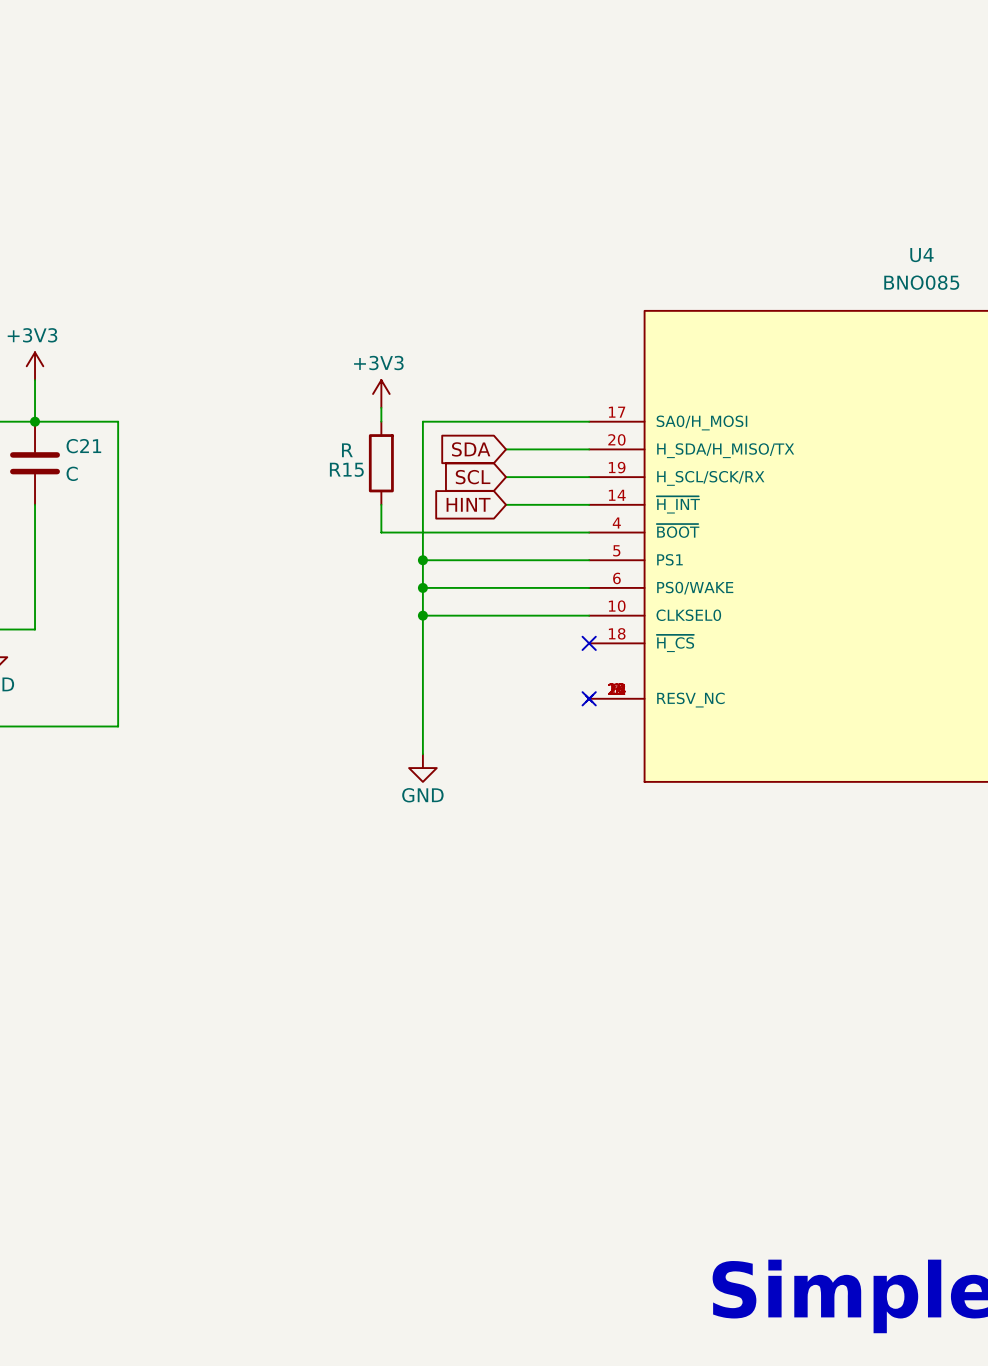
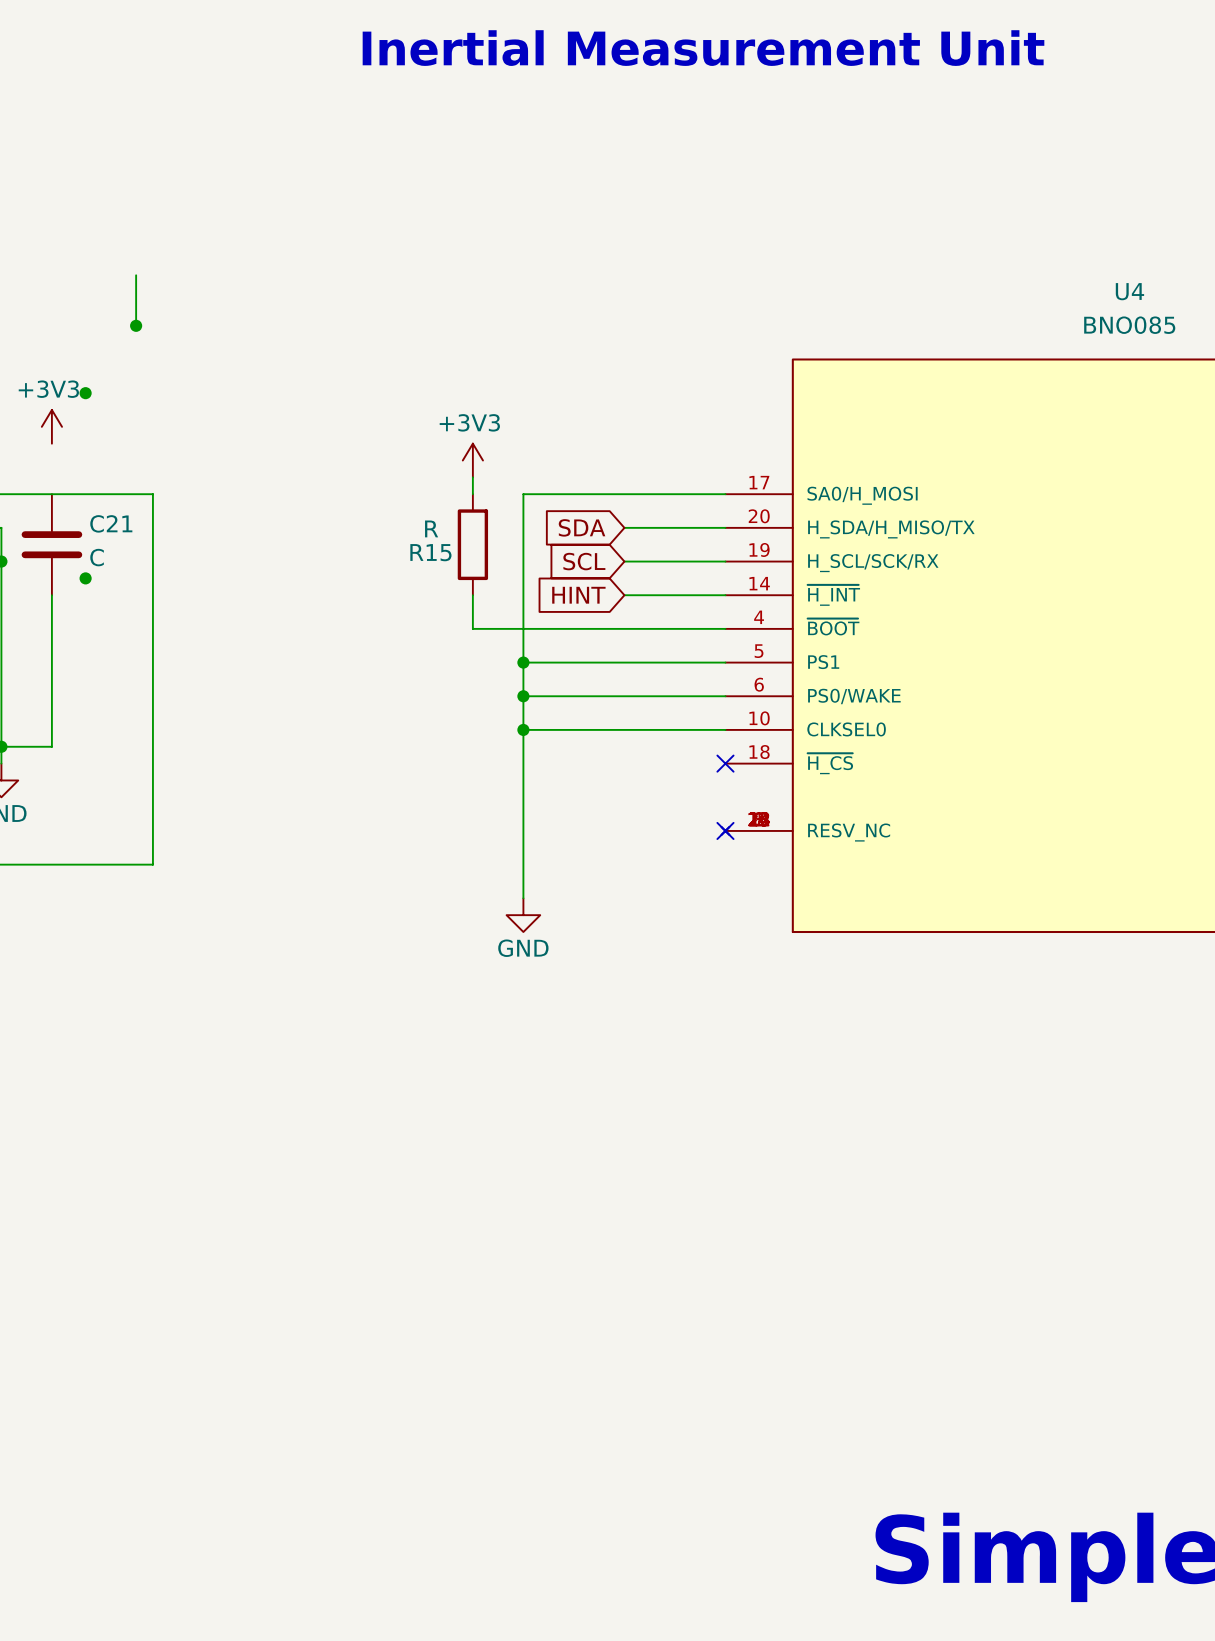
text: none -> Inertial Measurement Unit (703, 48)
junction: none -> (136, 325)
junction: none -> (85, 393)
wire: (35, 380) (35, 421) -> (136, 275) (136, 325)
junction: (35, 421) -> none
junction: none -> (85, 578)

